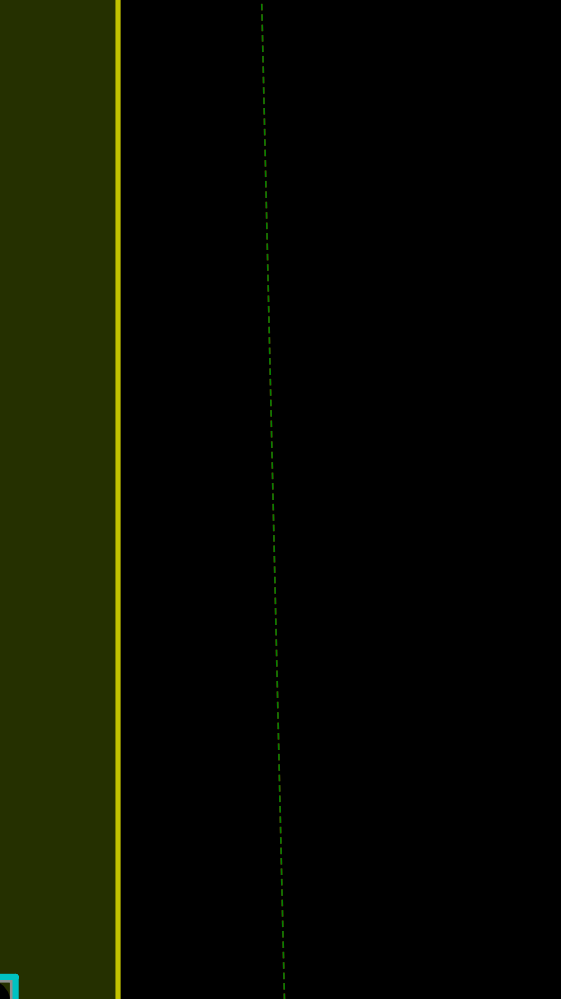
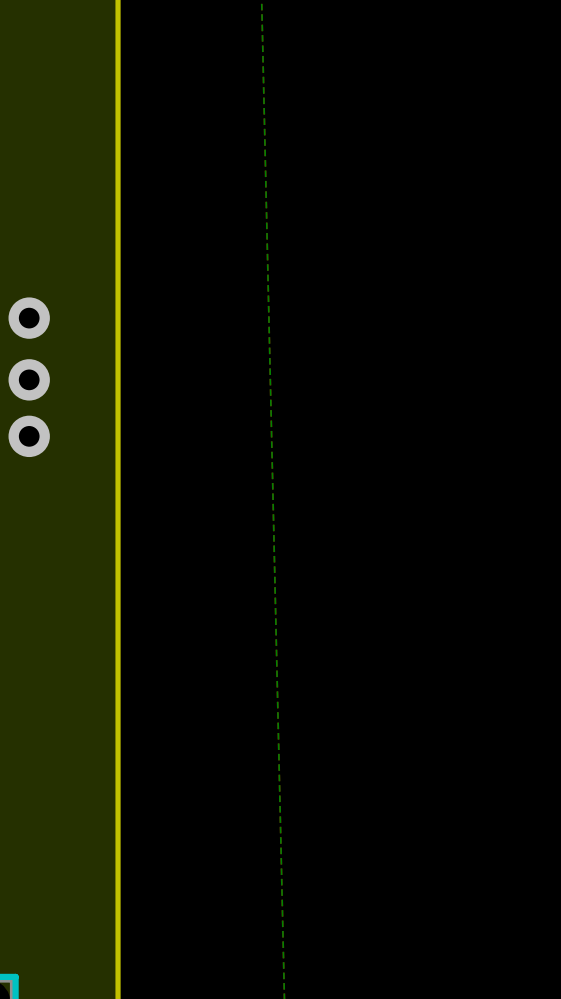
via: none -> (29, 318)
via: none -> (29, 379)
via: none -> (29, 436)

